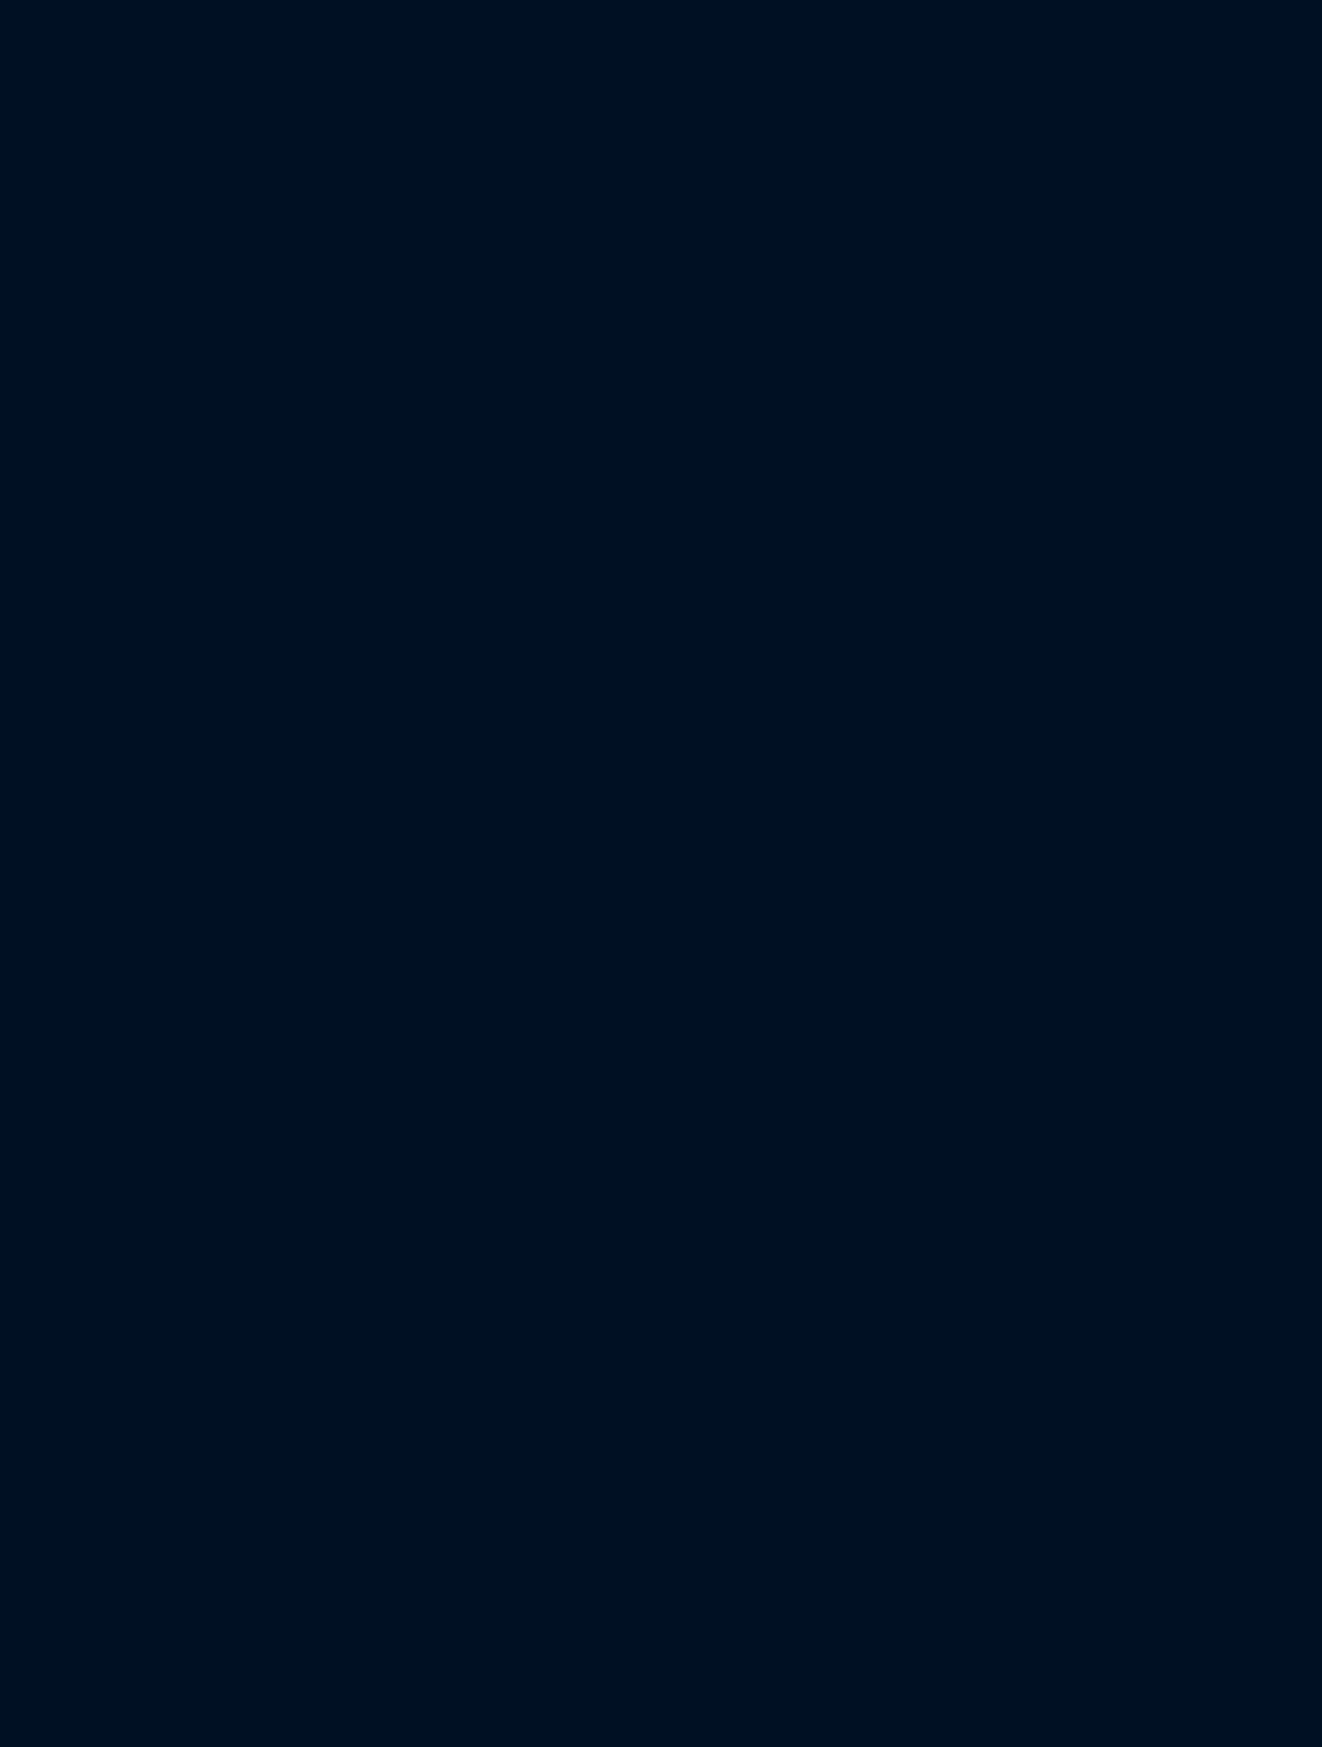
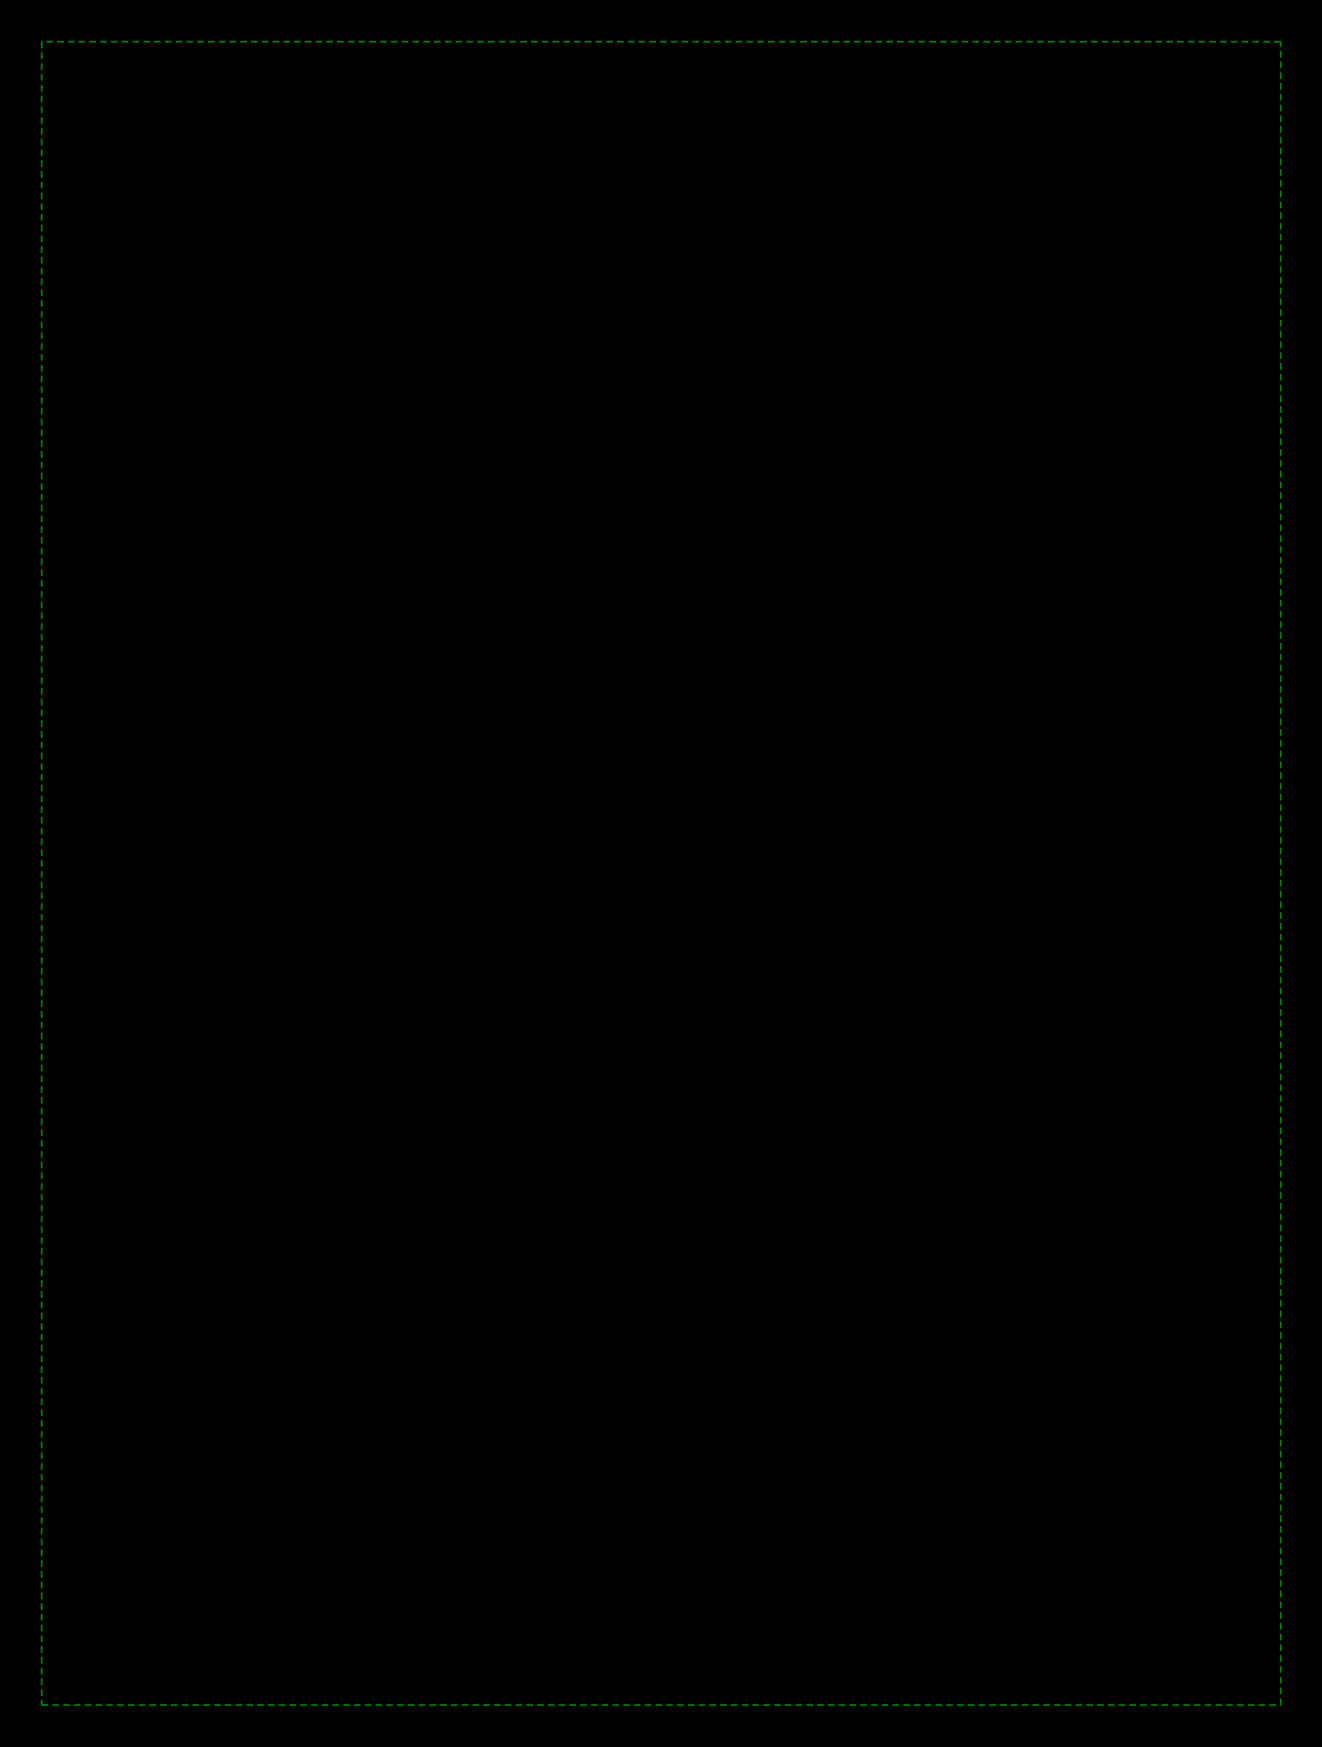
zone outline: none -> (1280, 41) (41, 41) (41, 1705) (1280, 1705) (1280, 41)

